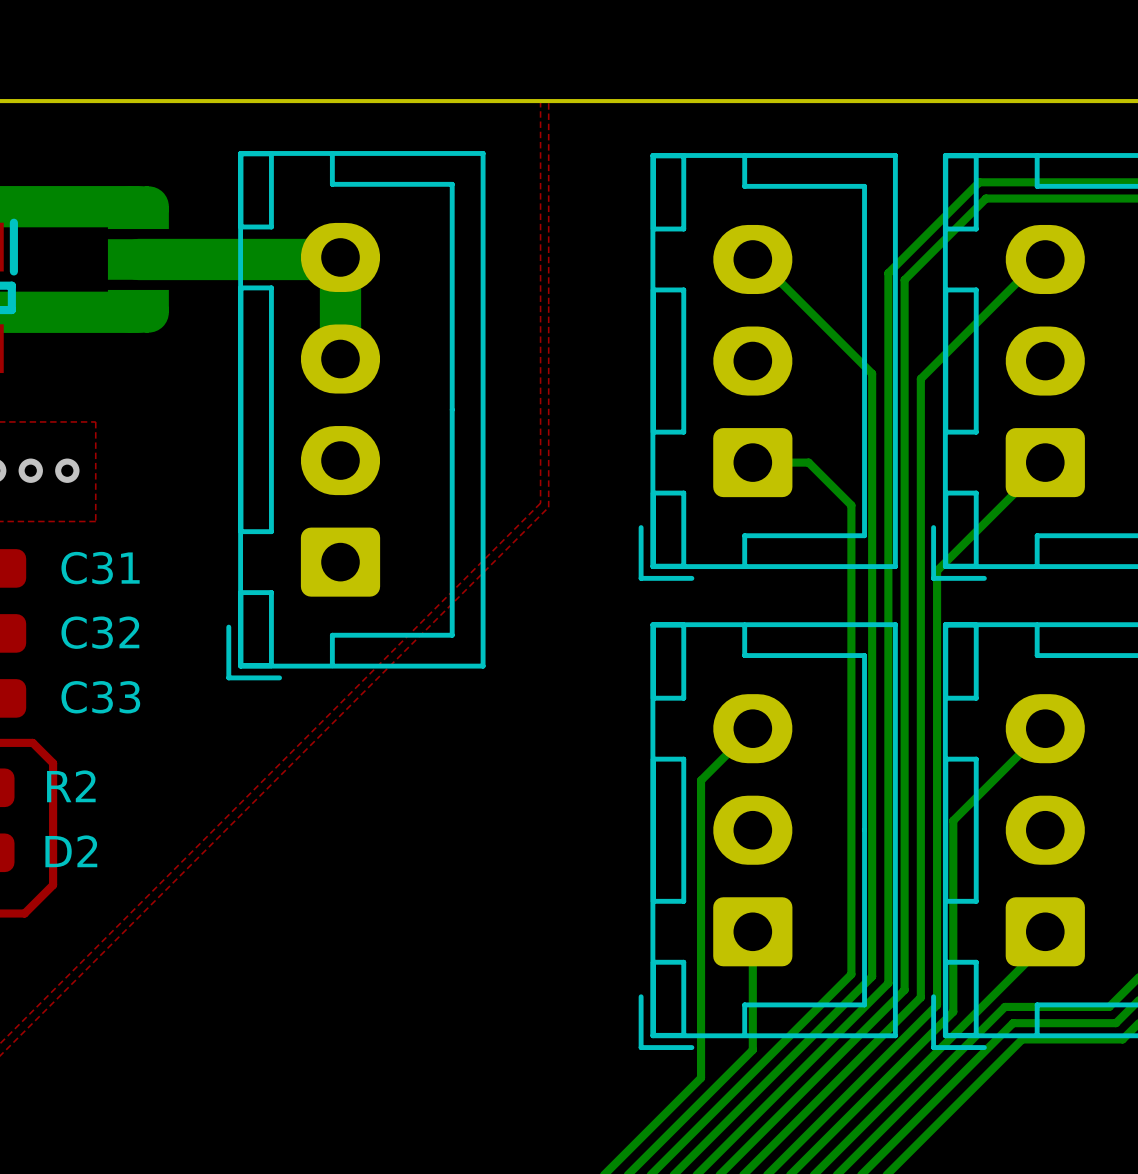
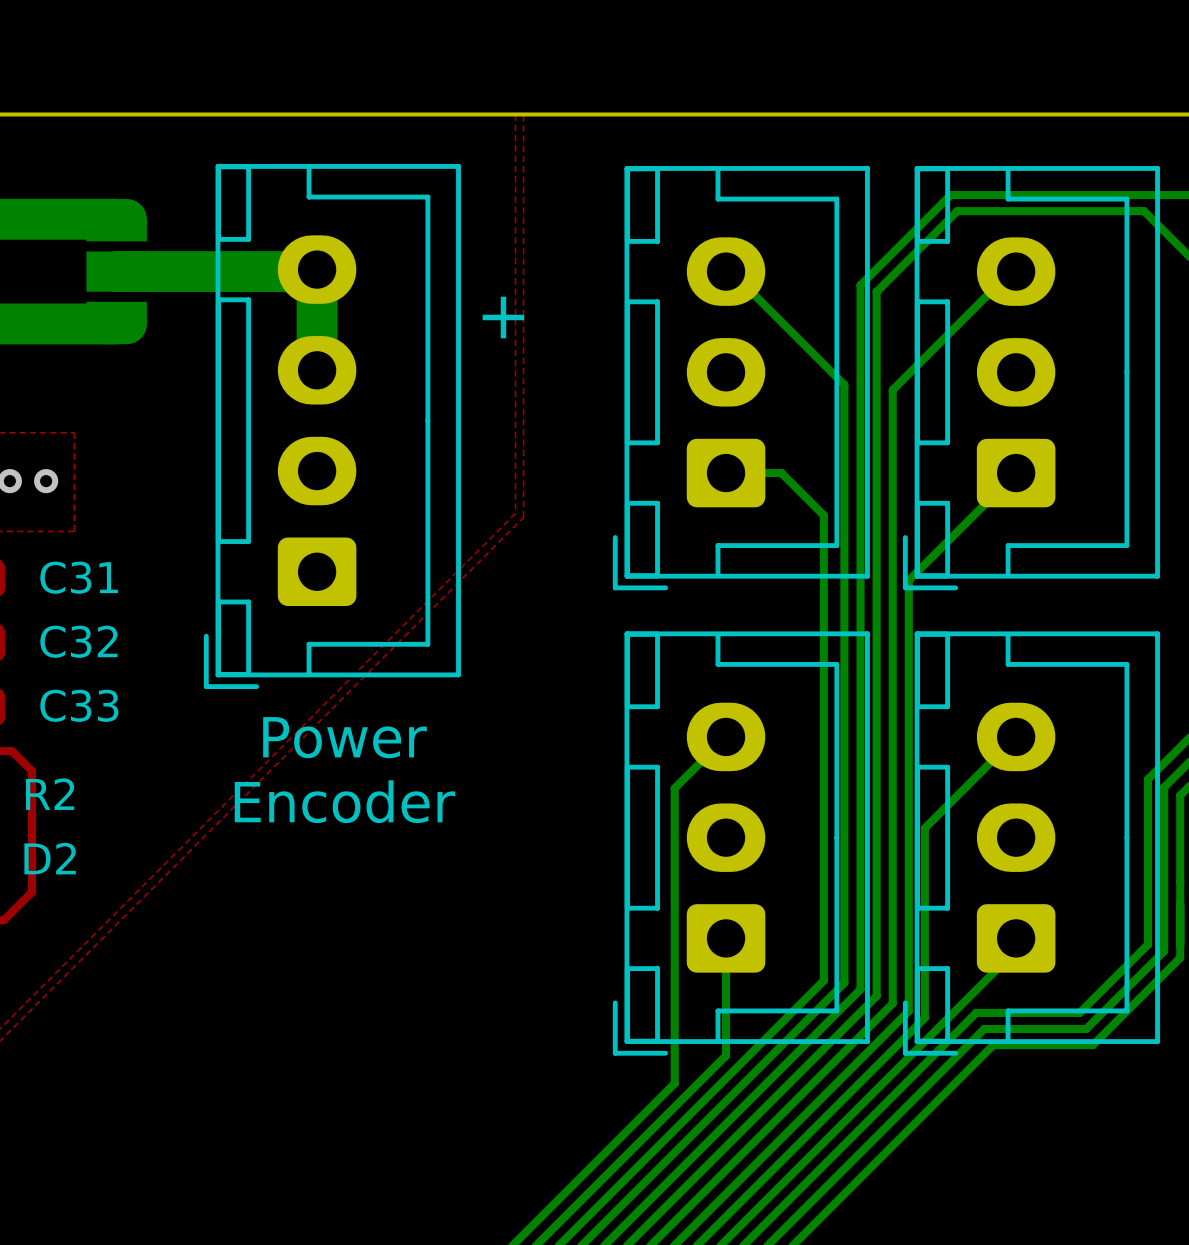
text: none -> + (503, 317)
text: none -> Power (344, 737)
text: none -> Encoder (344, 801)

